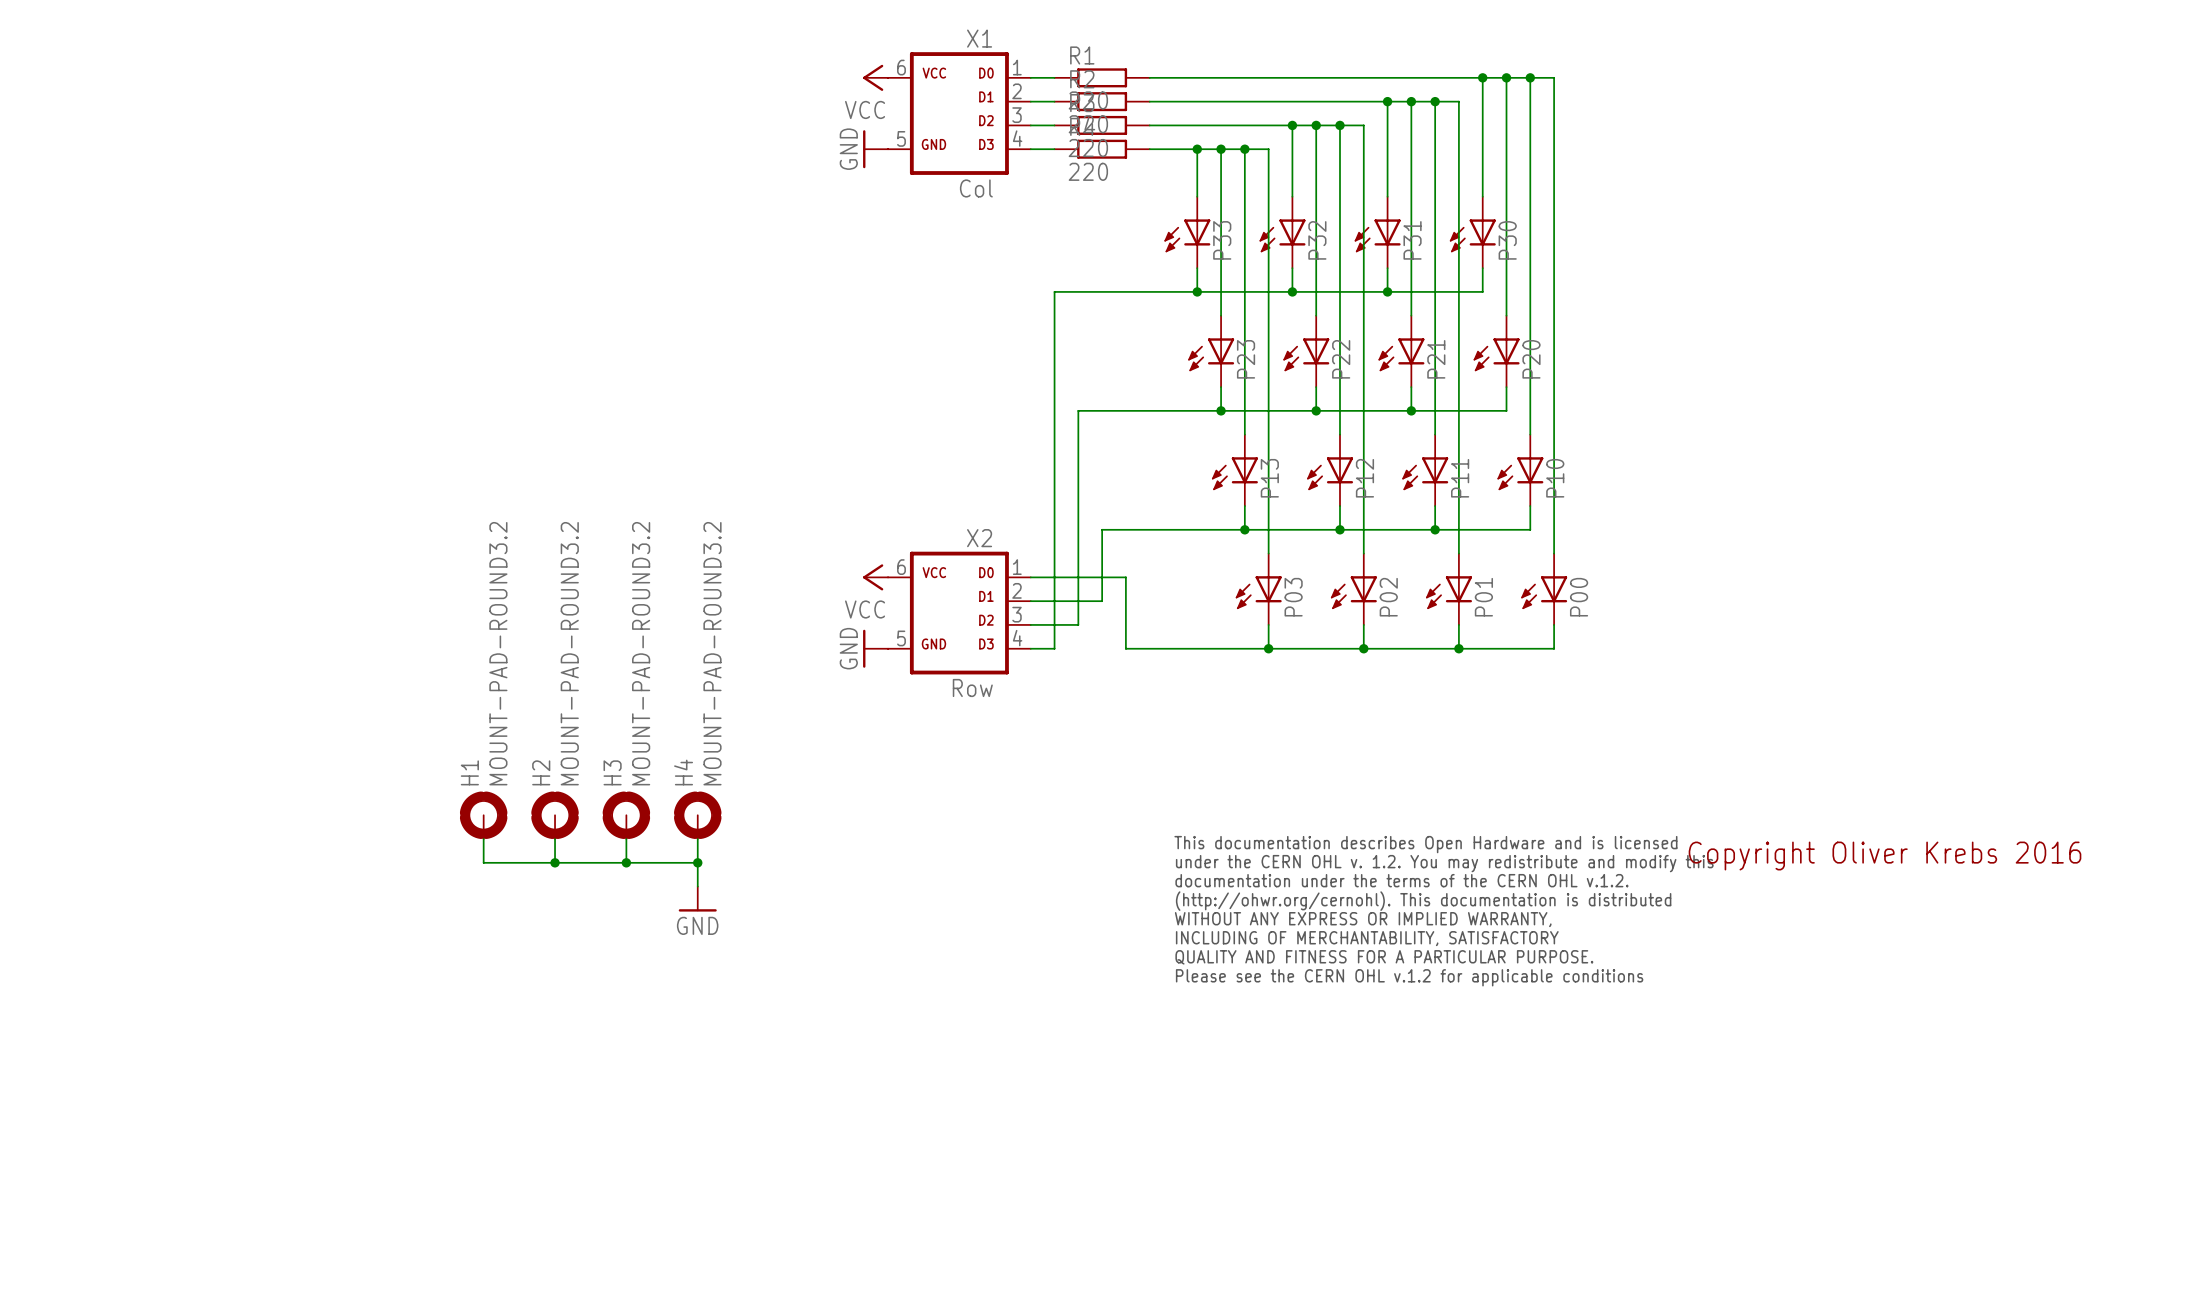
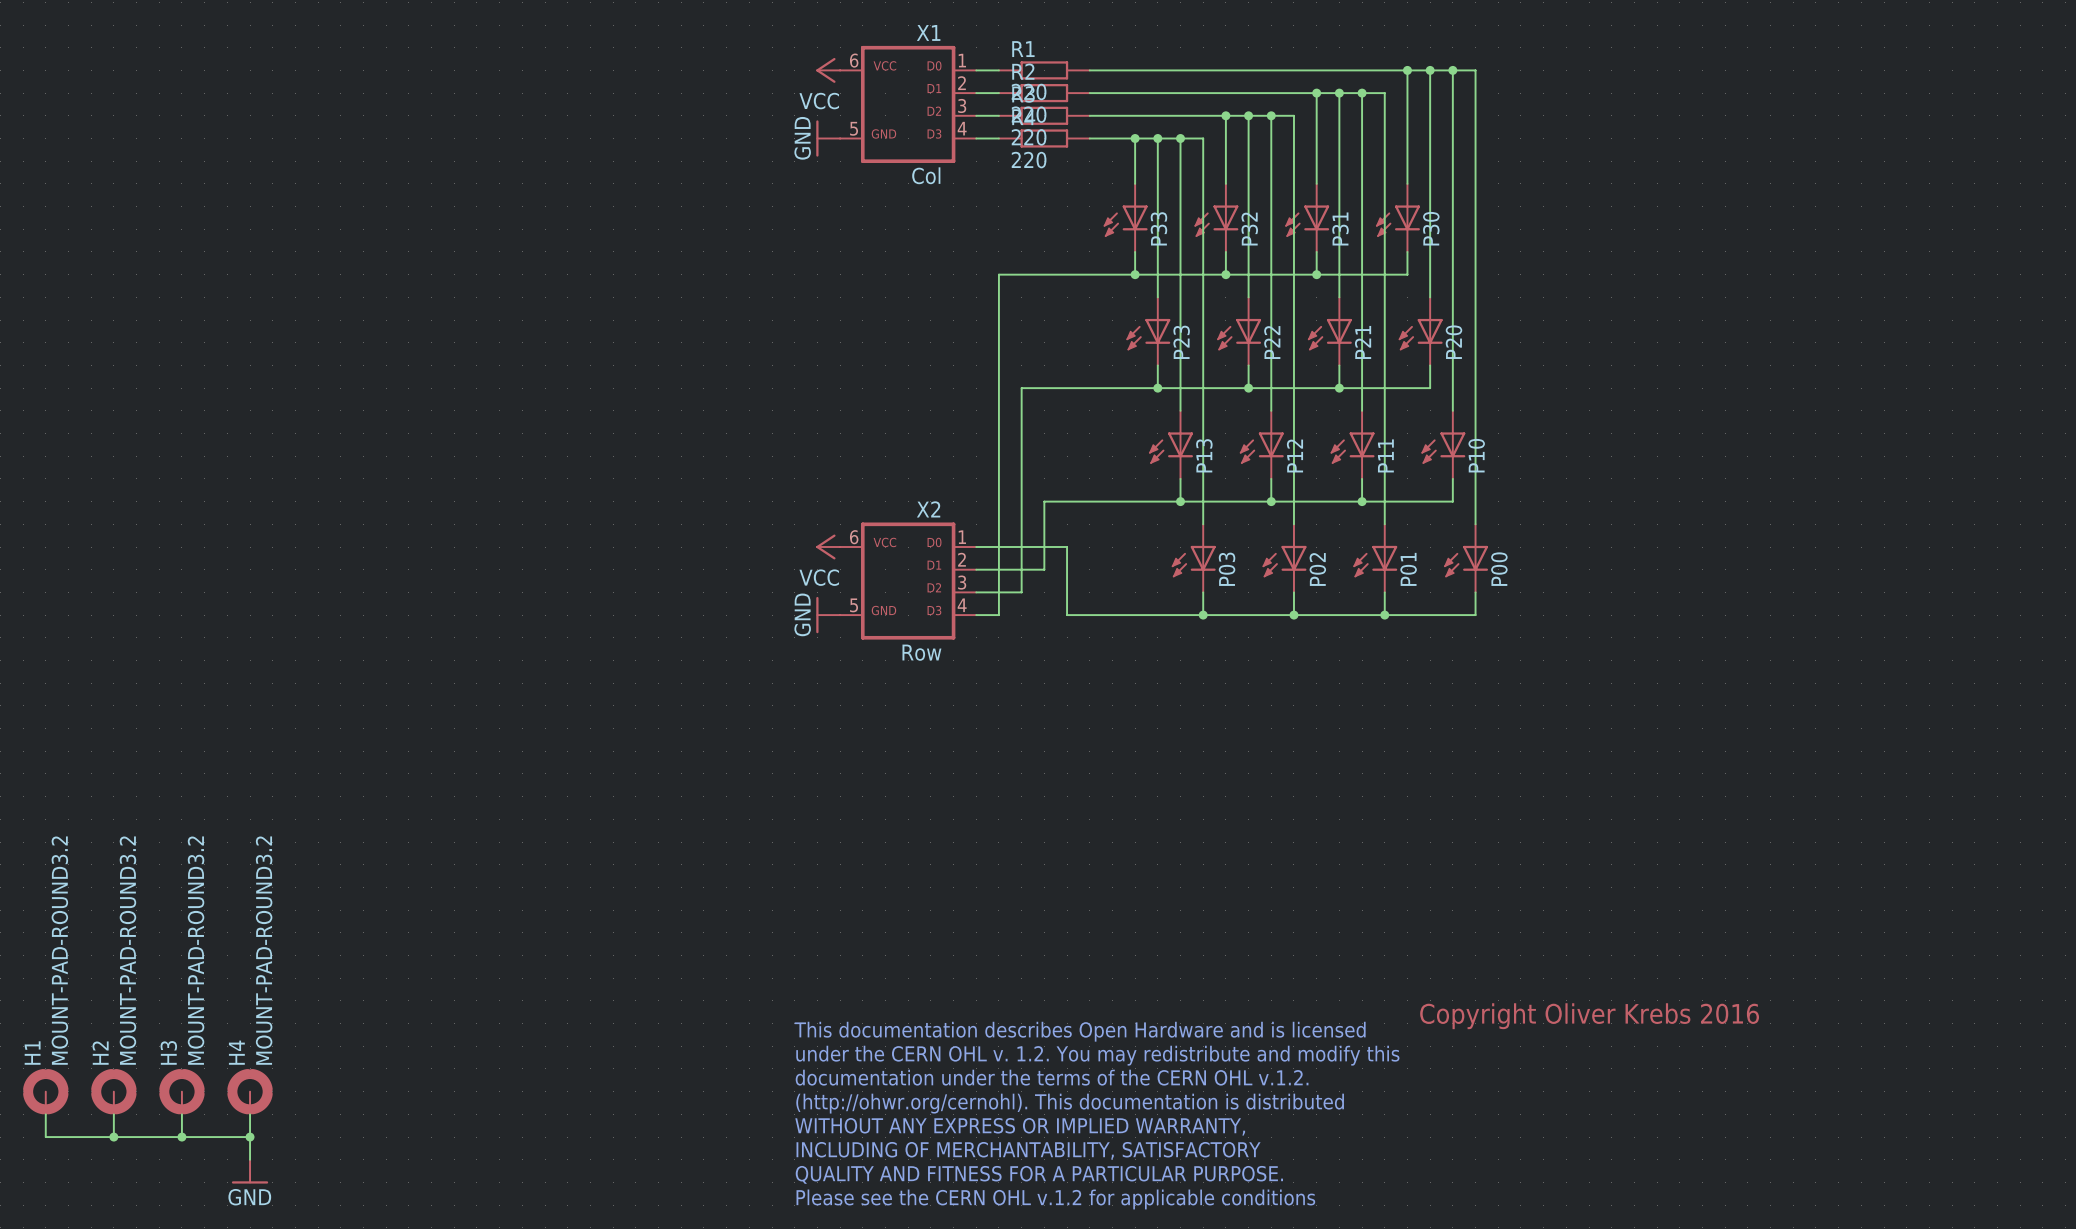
H1 position: (483, 815) -> (45, 1091)
H2 position: (555, 815) -> (113, 1091)
H3 position: (626, 815) -> (181, 1091)
H4 position: (697, 815) -> (250, 1091)
wire: (483, 839) (483, 862) (697, 862) -> none
wire: (555, 839) (555, 862) -> none
wire: (626, 839) (626, 862) -> none
wire: (697, 839) (697, 886) -> none
text: This documentation describes Open Hardware and is licensed (1425, 844) -> none
text: Copyright Oliver Krebs 2016 (1885, 856) -> none
junction: (555, 862) -> none
junction: (626, 862) -> none
junction: (697, 862) -> none
text: under the CERN OHL v. 1.2. You may redistribute and modify this (1444, 863) -> none
text: documentation under the terms of the CERN OHL v.1.2. (1401, 880) -> none
power symbol: GND (697, 899) -> none
text: (http://ohwr.org/cernohl). This documentation is distributed (1423, 901) -> none
text: WITHOUT ANY EXPRESS OR IMPLIED WARRANTY, (1363, 919) -> none
text: INCLUDING OF MERCHANTABILITY, SATISFACTORY (1367, 938) -> none
text: QUALITY AND FITNESS FOR A PARTICULAR PURPOSE. (1384, 957) -> none
text: Please see the CERN OHL v.1.2 for applicable conditions (1409, 977) -> none
text: none -> Copyright Oliver Krebs 2016 (1589, 1016)
text: none -> This documentation describes Open Hardware and is licensed (1080, 1031)
text: none -> under the CERN OHL v. 1.2. You may redistribute and modify this (1097, 1055)
text: none -> documentation under the terms of the CERN OHL v.1.2. (1052, 1077)
text: none -> (http://ohwr.org/cernohl). This documentation is distributed (1070, 1103)
wire: none -> (45, 1114) (45, 1137) (250, 1137)
wire: none -> (113, 1114) (113, 1137)
wire: none -> (181, 1114) (181, 1137)
wire: none -> (250, 1114) (250, 1159)
text: none -> WITHOUT ANY EXPRESS OR IMPLIED WARRANTY, (1020, 1126)
junction: none -> (113, 1137)
junction: none -> (181, 1137)
junction: none -> (250, 1137)
text: none -> INCLUDING OF MERCHANTABILITY, SATISFACTORY (1028, 1150)
power symbol: none -> GND (250, 1171)
text: none -> QUALITY AND FITNESS FOR A PARTICULAR PURPOSE. (1039, 1174)
text: none -> Please see the CERN OHL v.1.2 for applicable conditions (1055, 1199)

